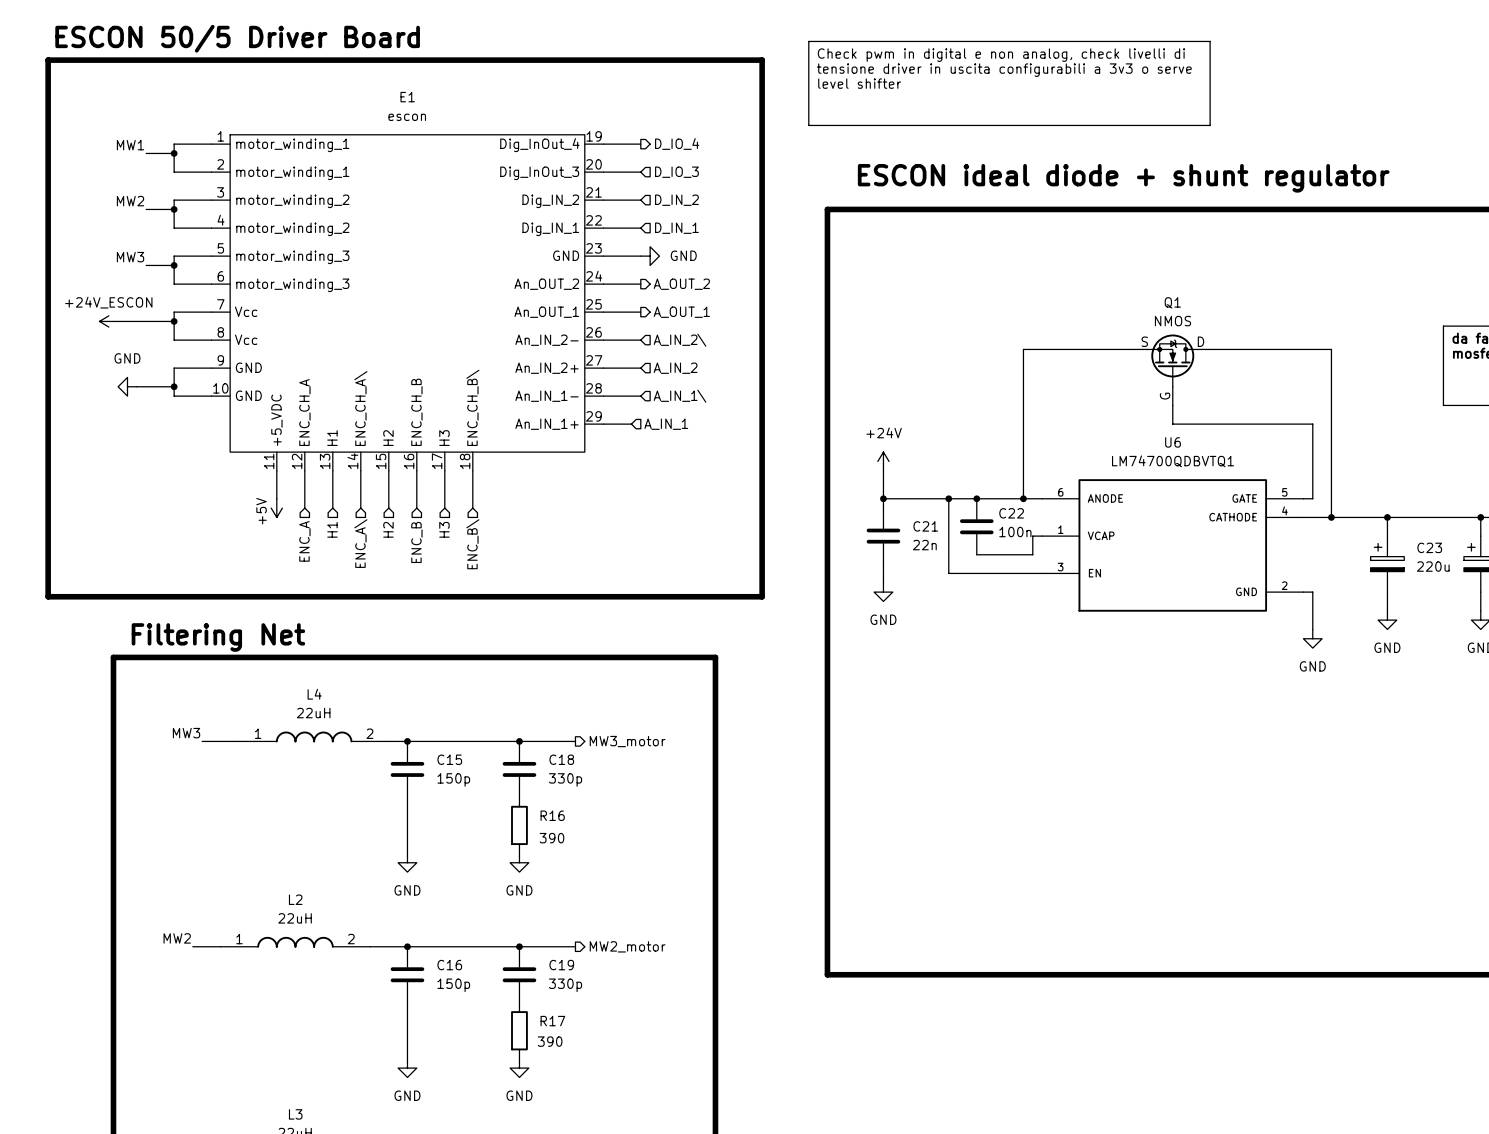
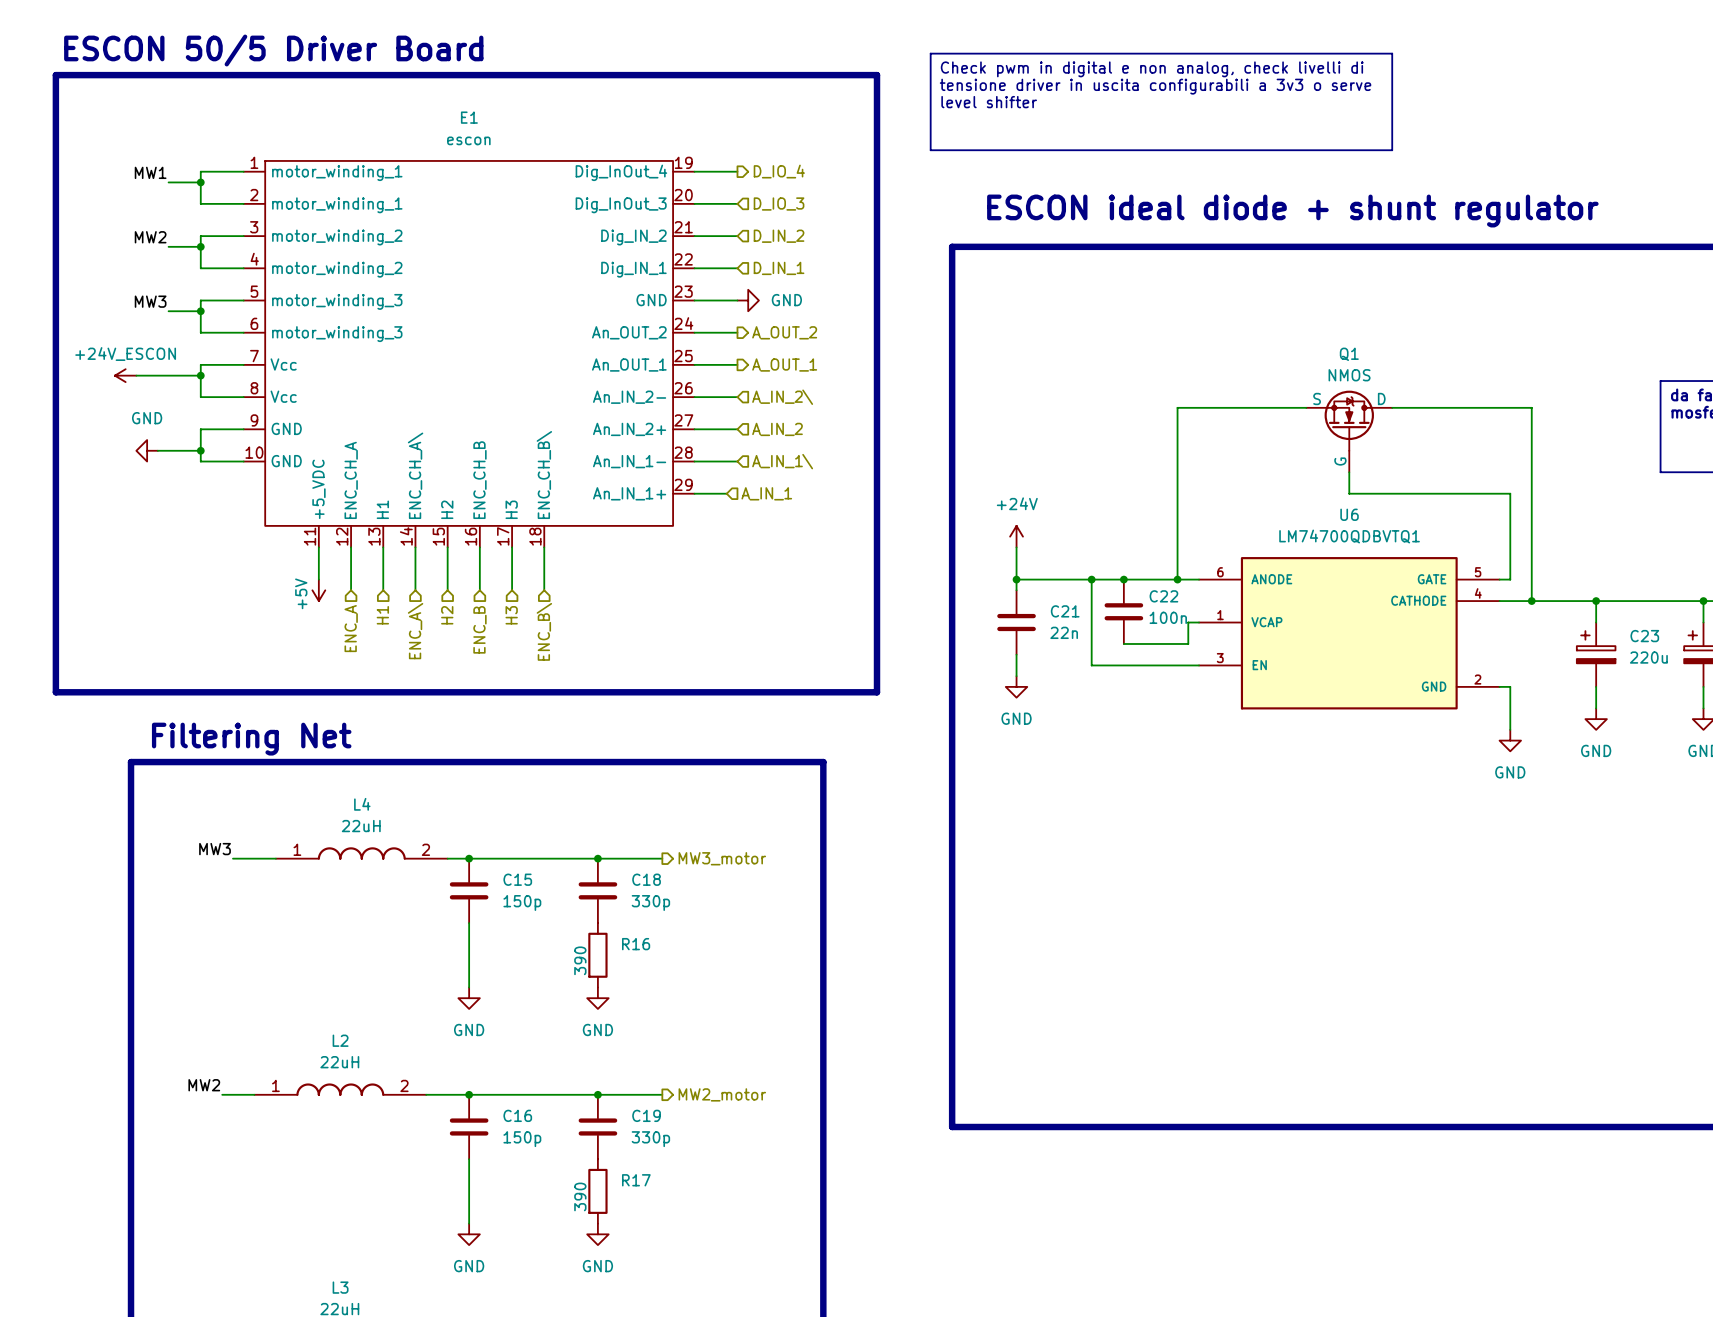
R16 value rotation: 0° (551, 838) -> 90° counterclockwise (580, 960)
R16 value position: 390 (551, 838) -> 390 (580, 960)
R17 value rotation: 0° (550, 1041) -> 90° counterclockwise (580, 1196)
R17 value position: 390 (550, 1041) -> 390 (580, 1196)

